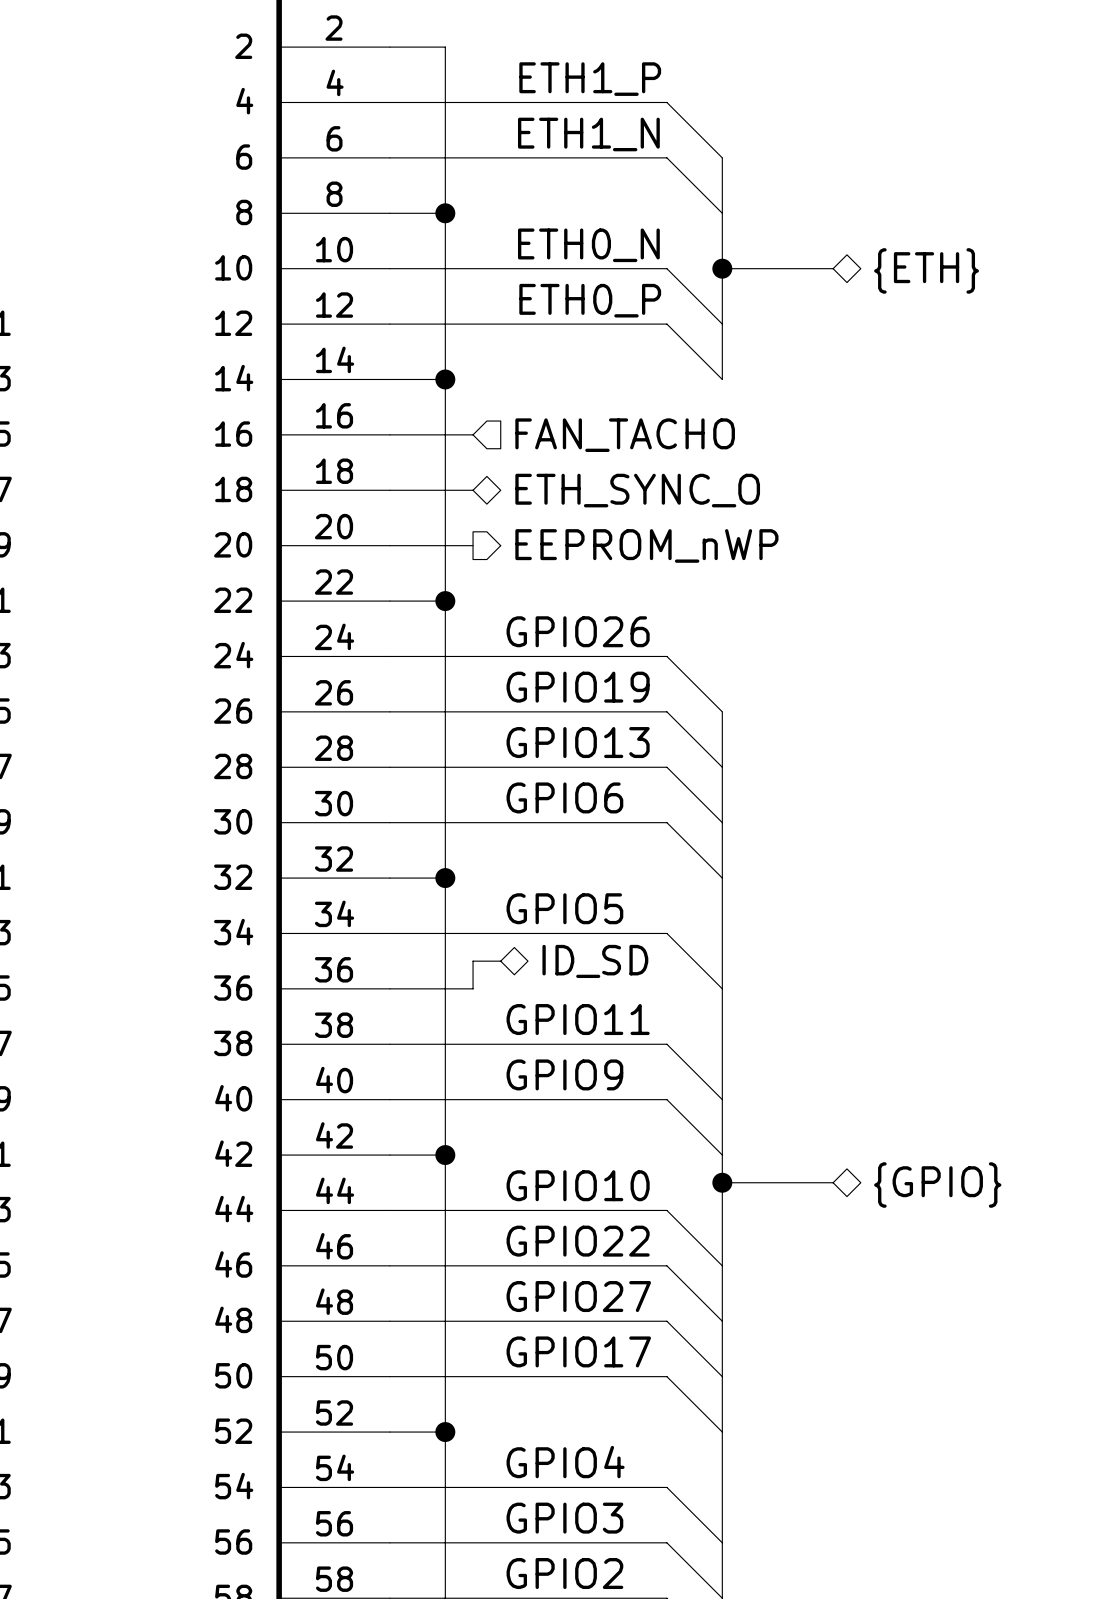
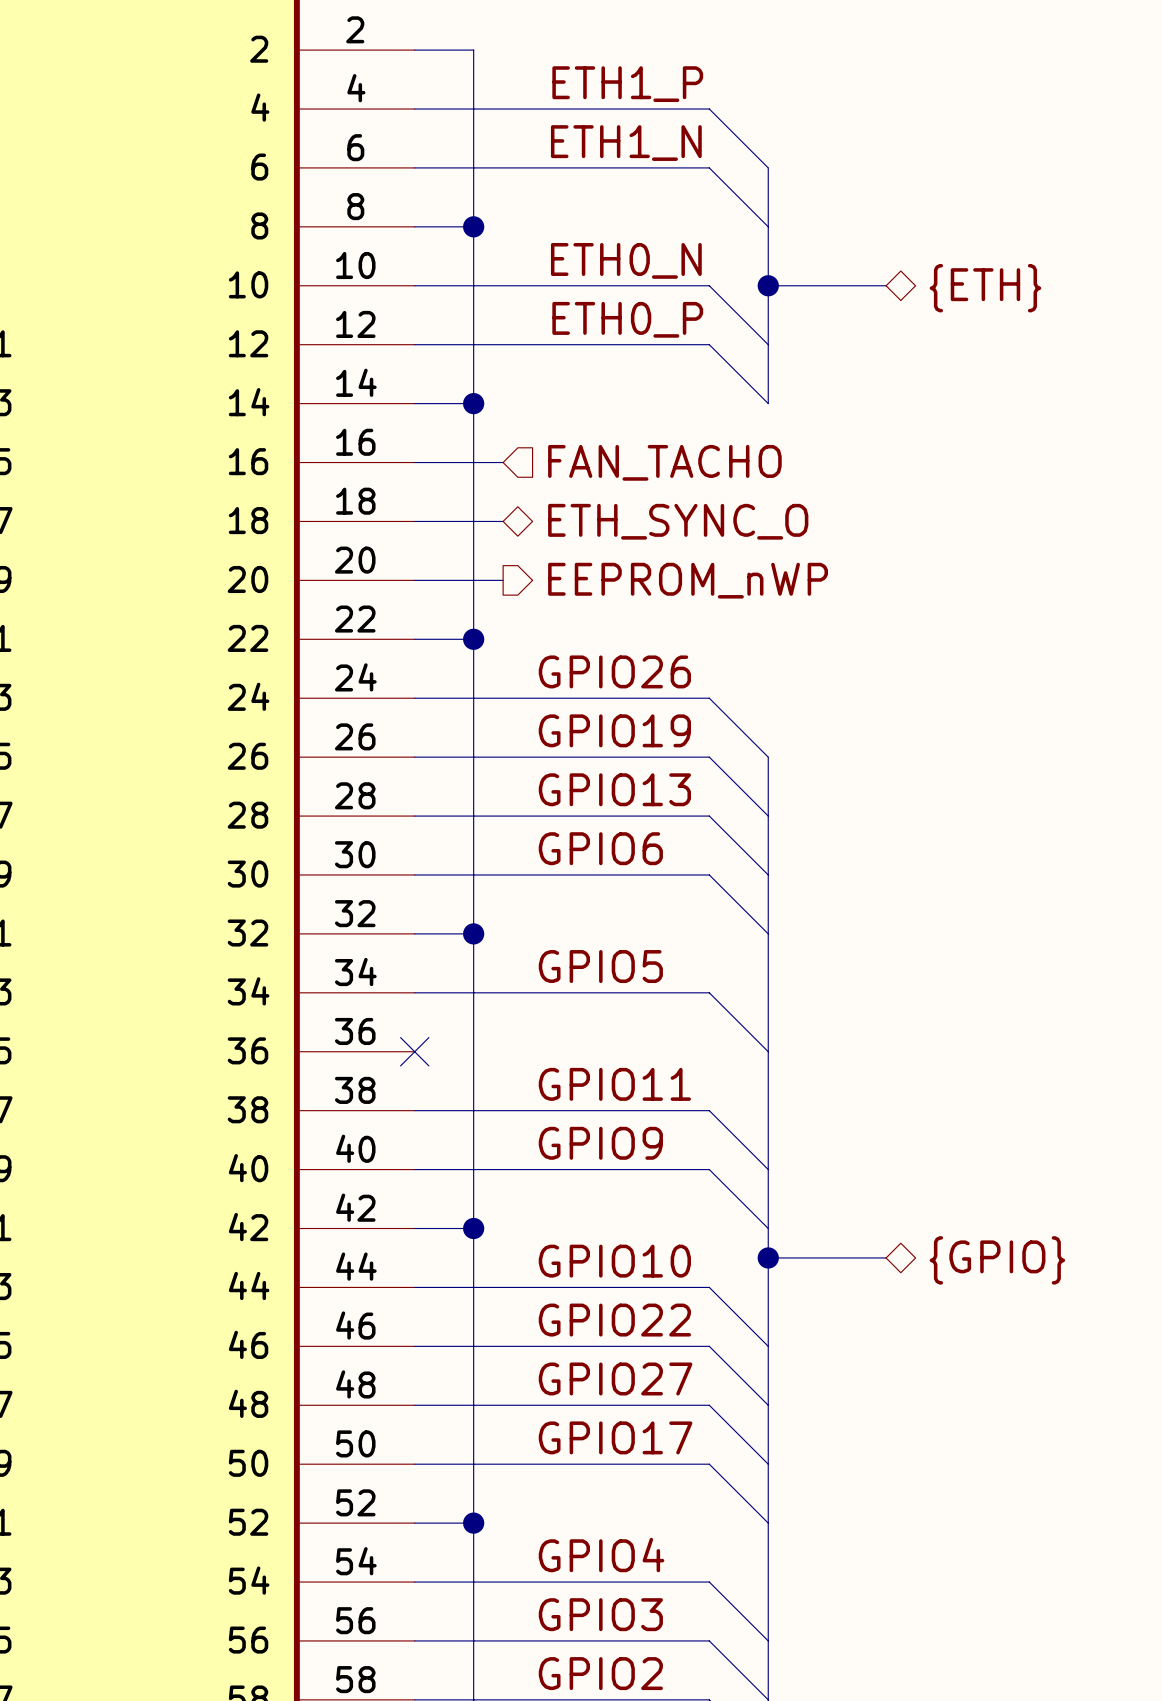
wire: (500, 961) (473, 961) (473, 988) (389, 988) -> none
hierarchical label: ID_SD (595, 961) -> none
no-connect mark: none -> (414, 1051)

